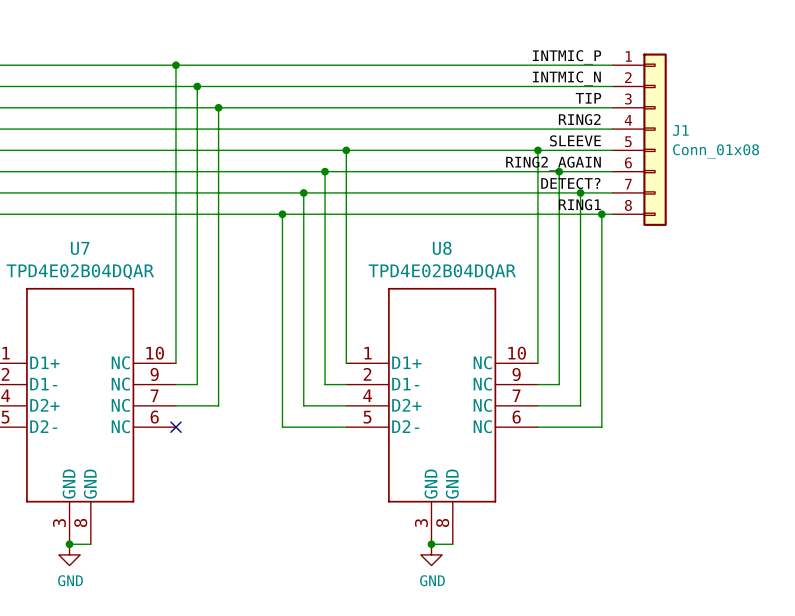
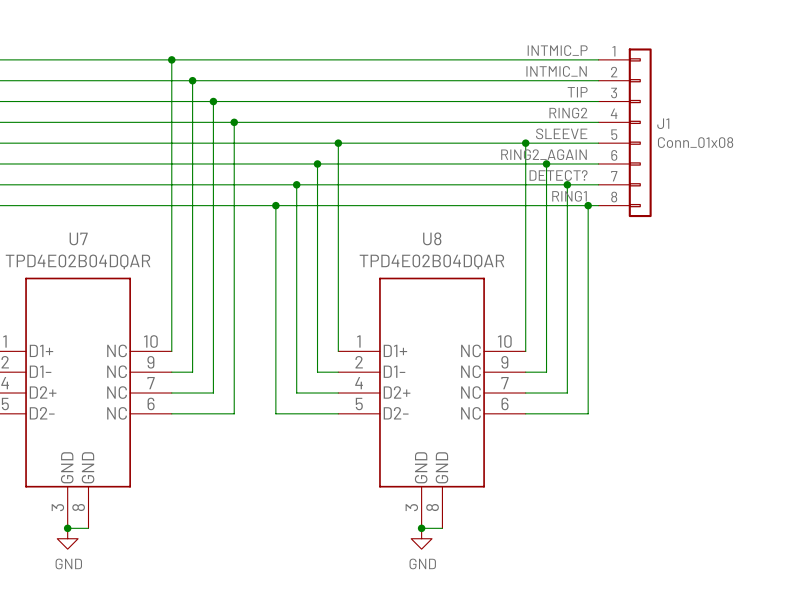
wire: none -> (234, 122) (234, 413) (171, 413)
junction: none -> (234, 122)
no-connect mark: (175, 427) -> none

